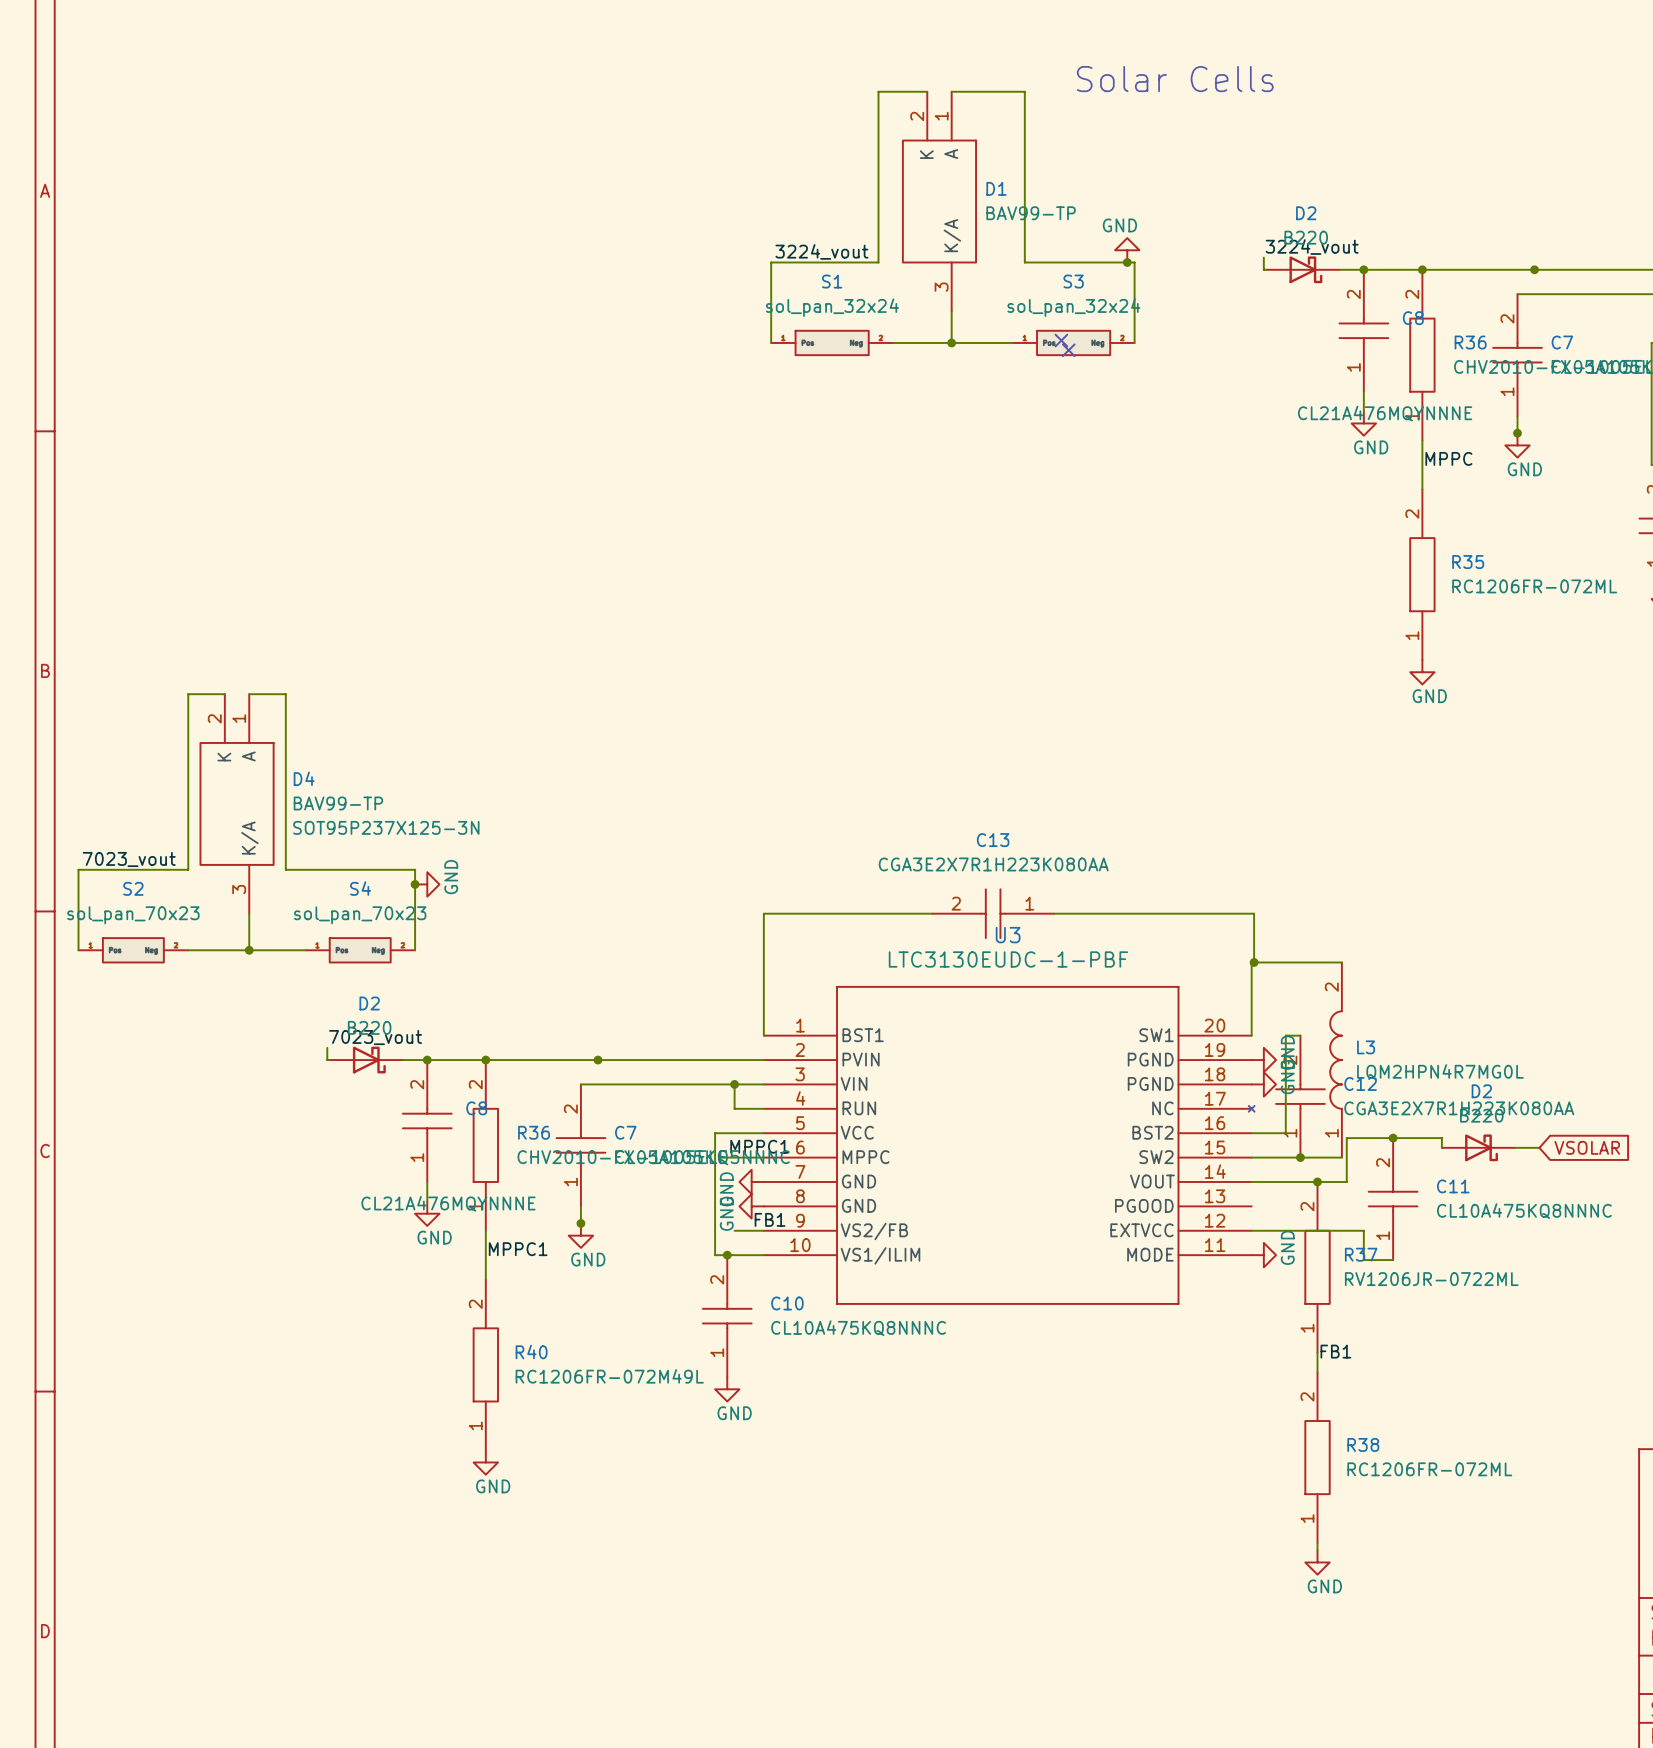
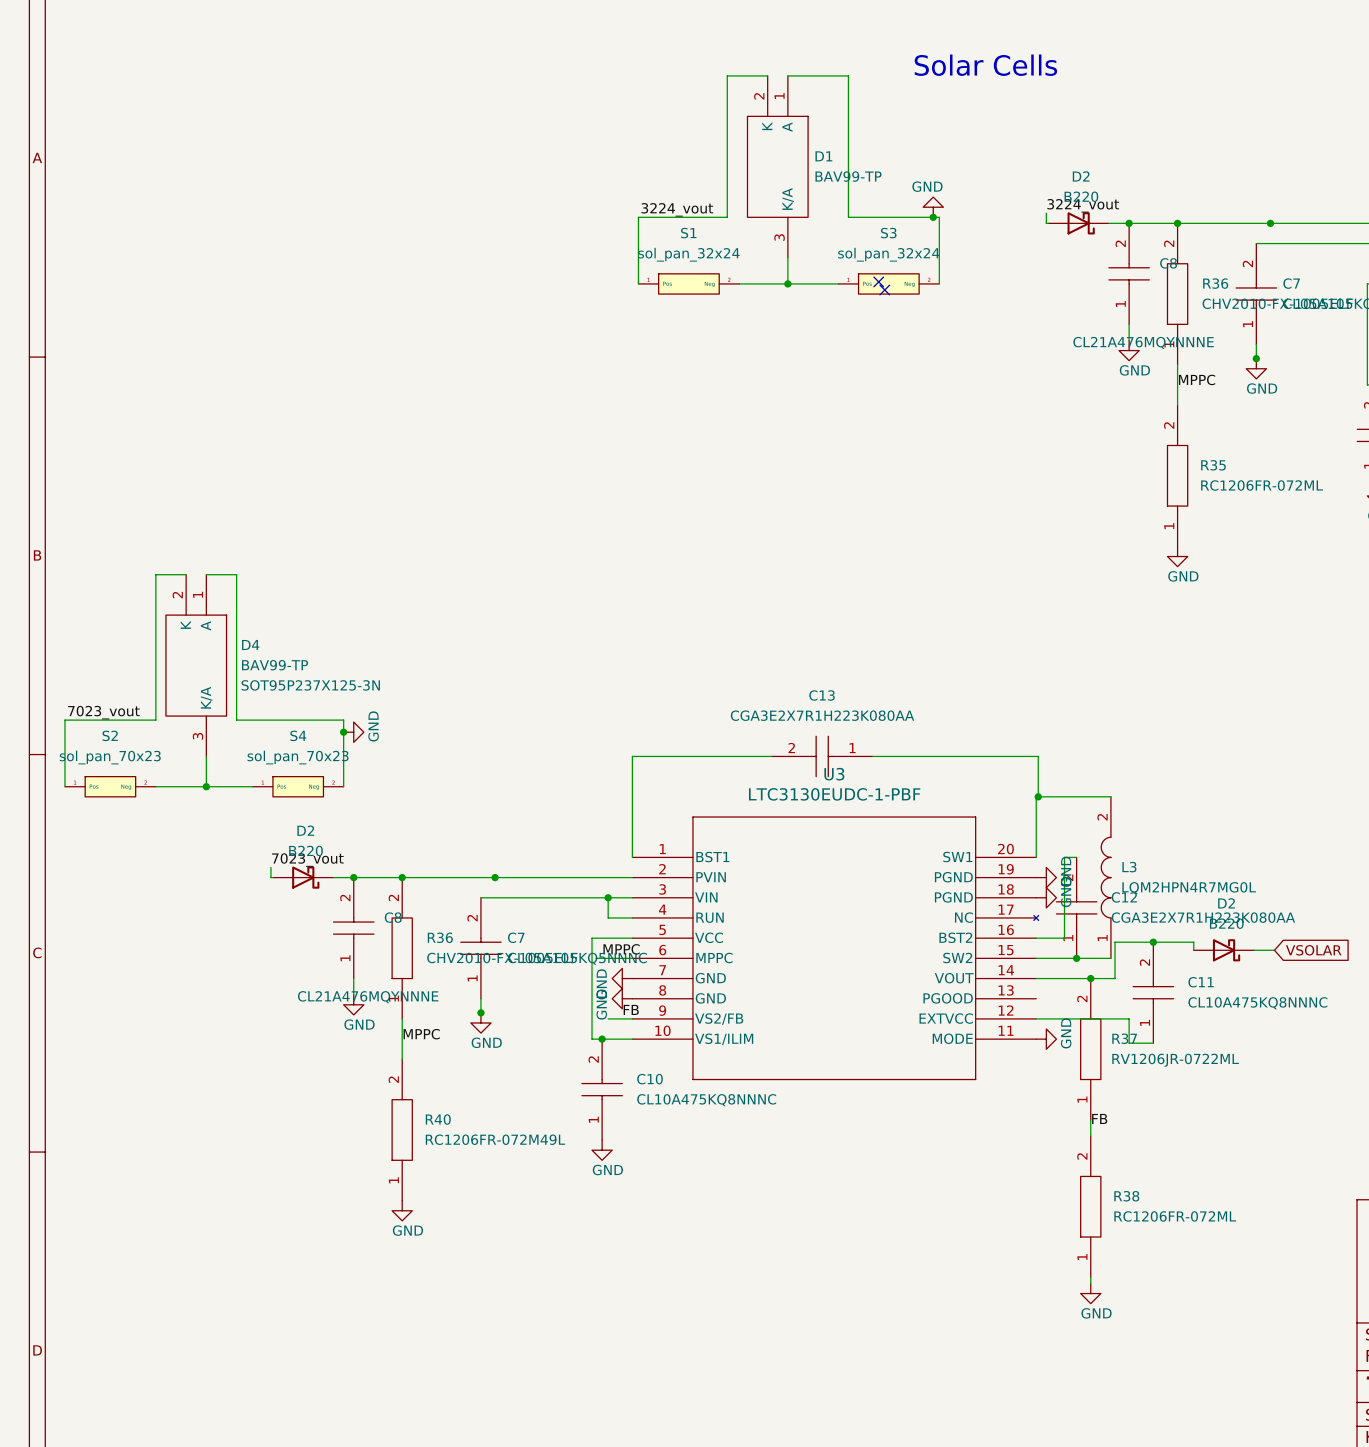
label: MPPC1 (759, 1146) -> MPPC (621, 949)
label: FB1 (770, 1219) -> FB (631, 1009)
label: MPPC1 (518, 1249) -> MPPC (421, 1034)
label: FB1 (1335, 1351) -> FB (1099, 1118)

